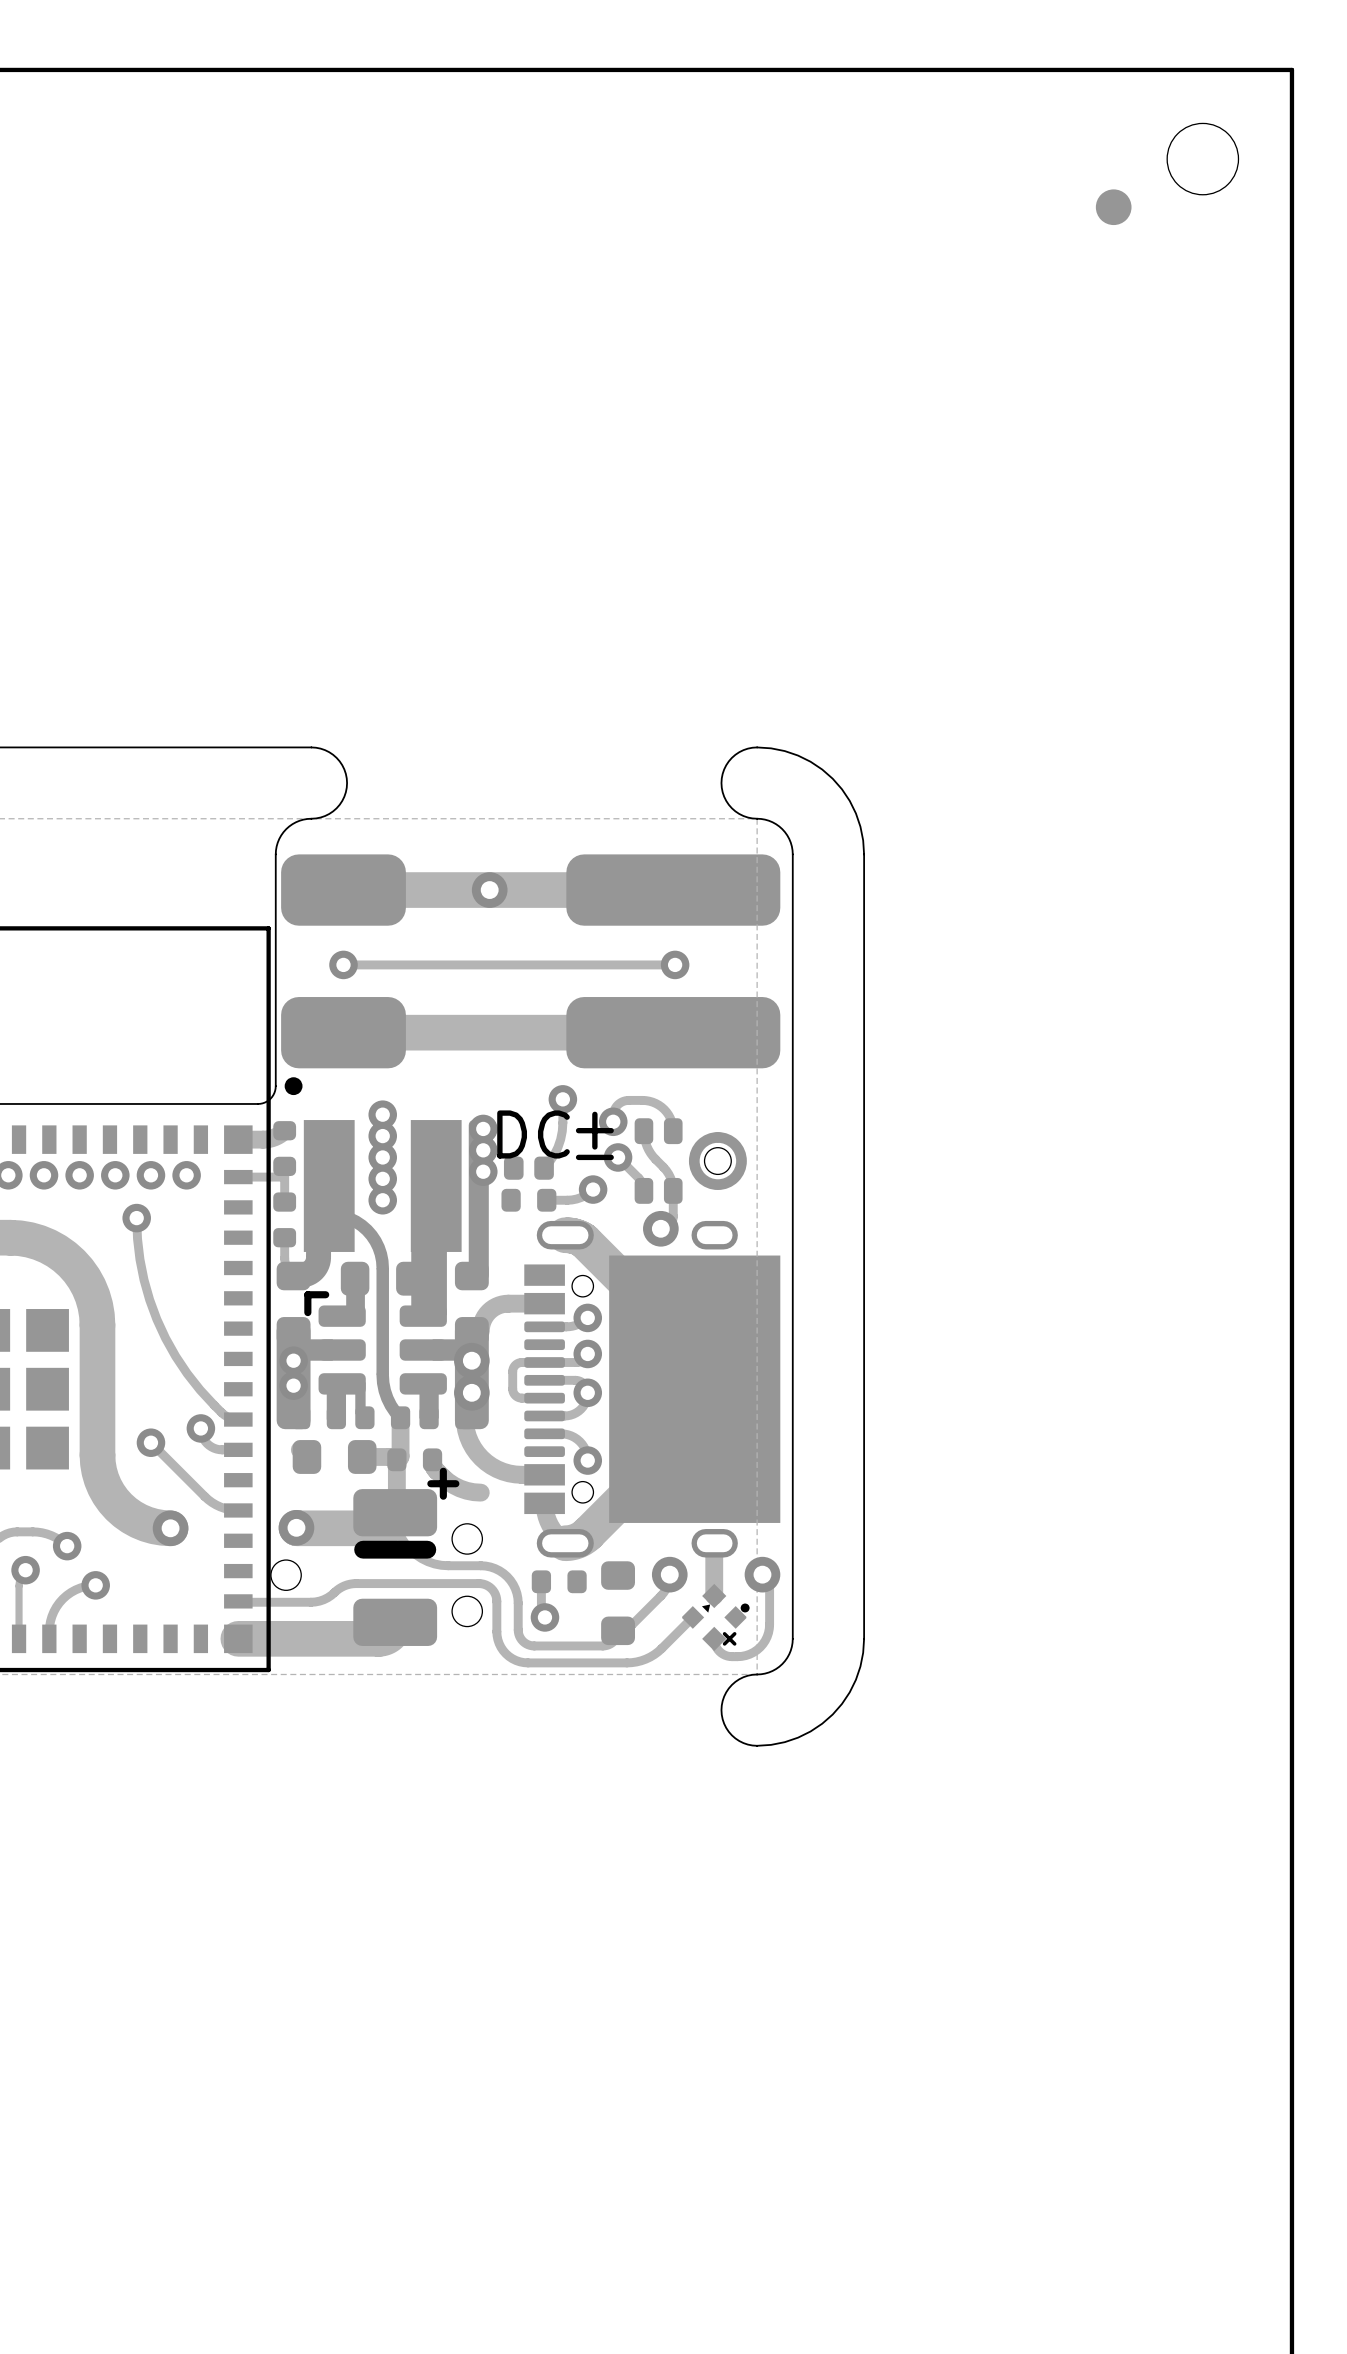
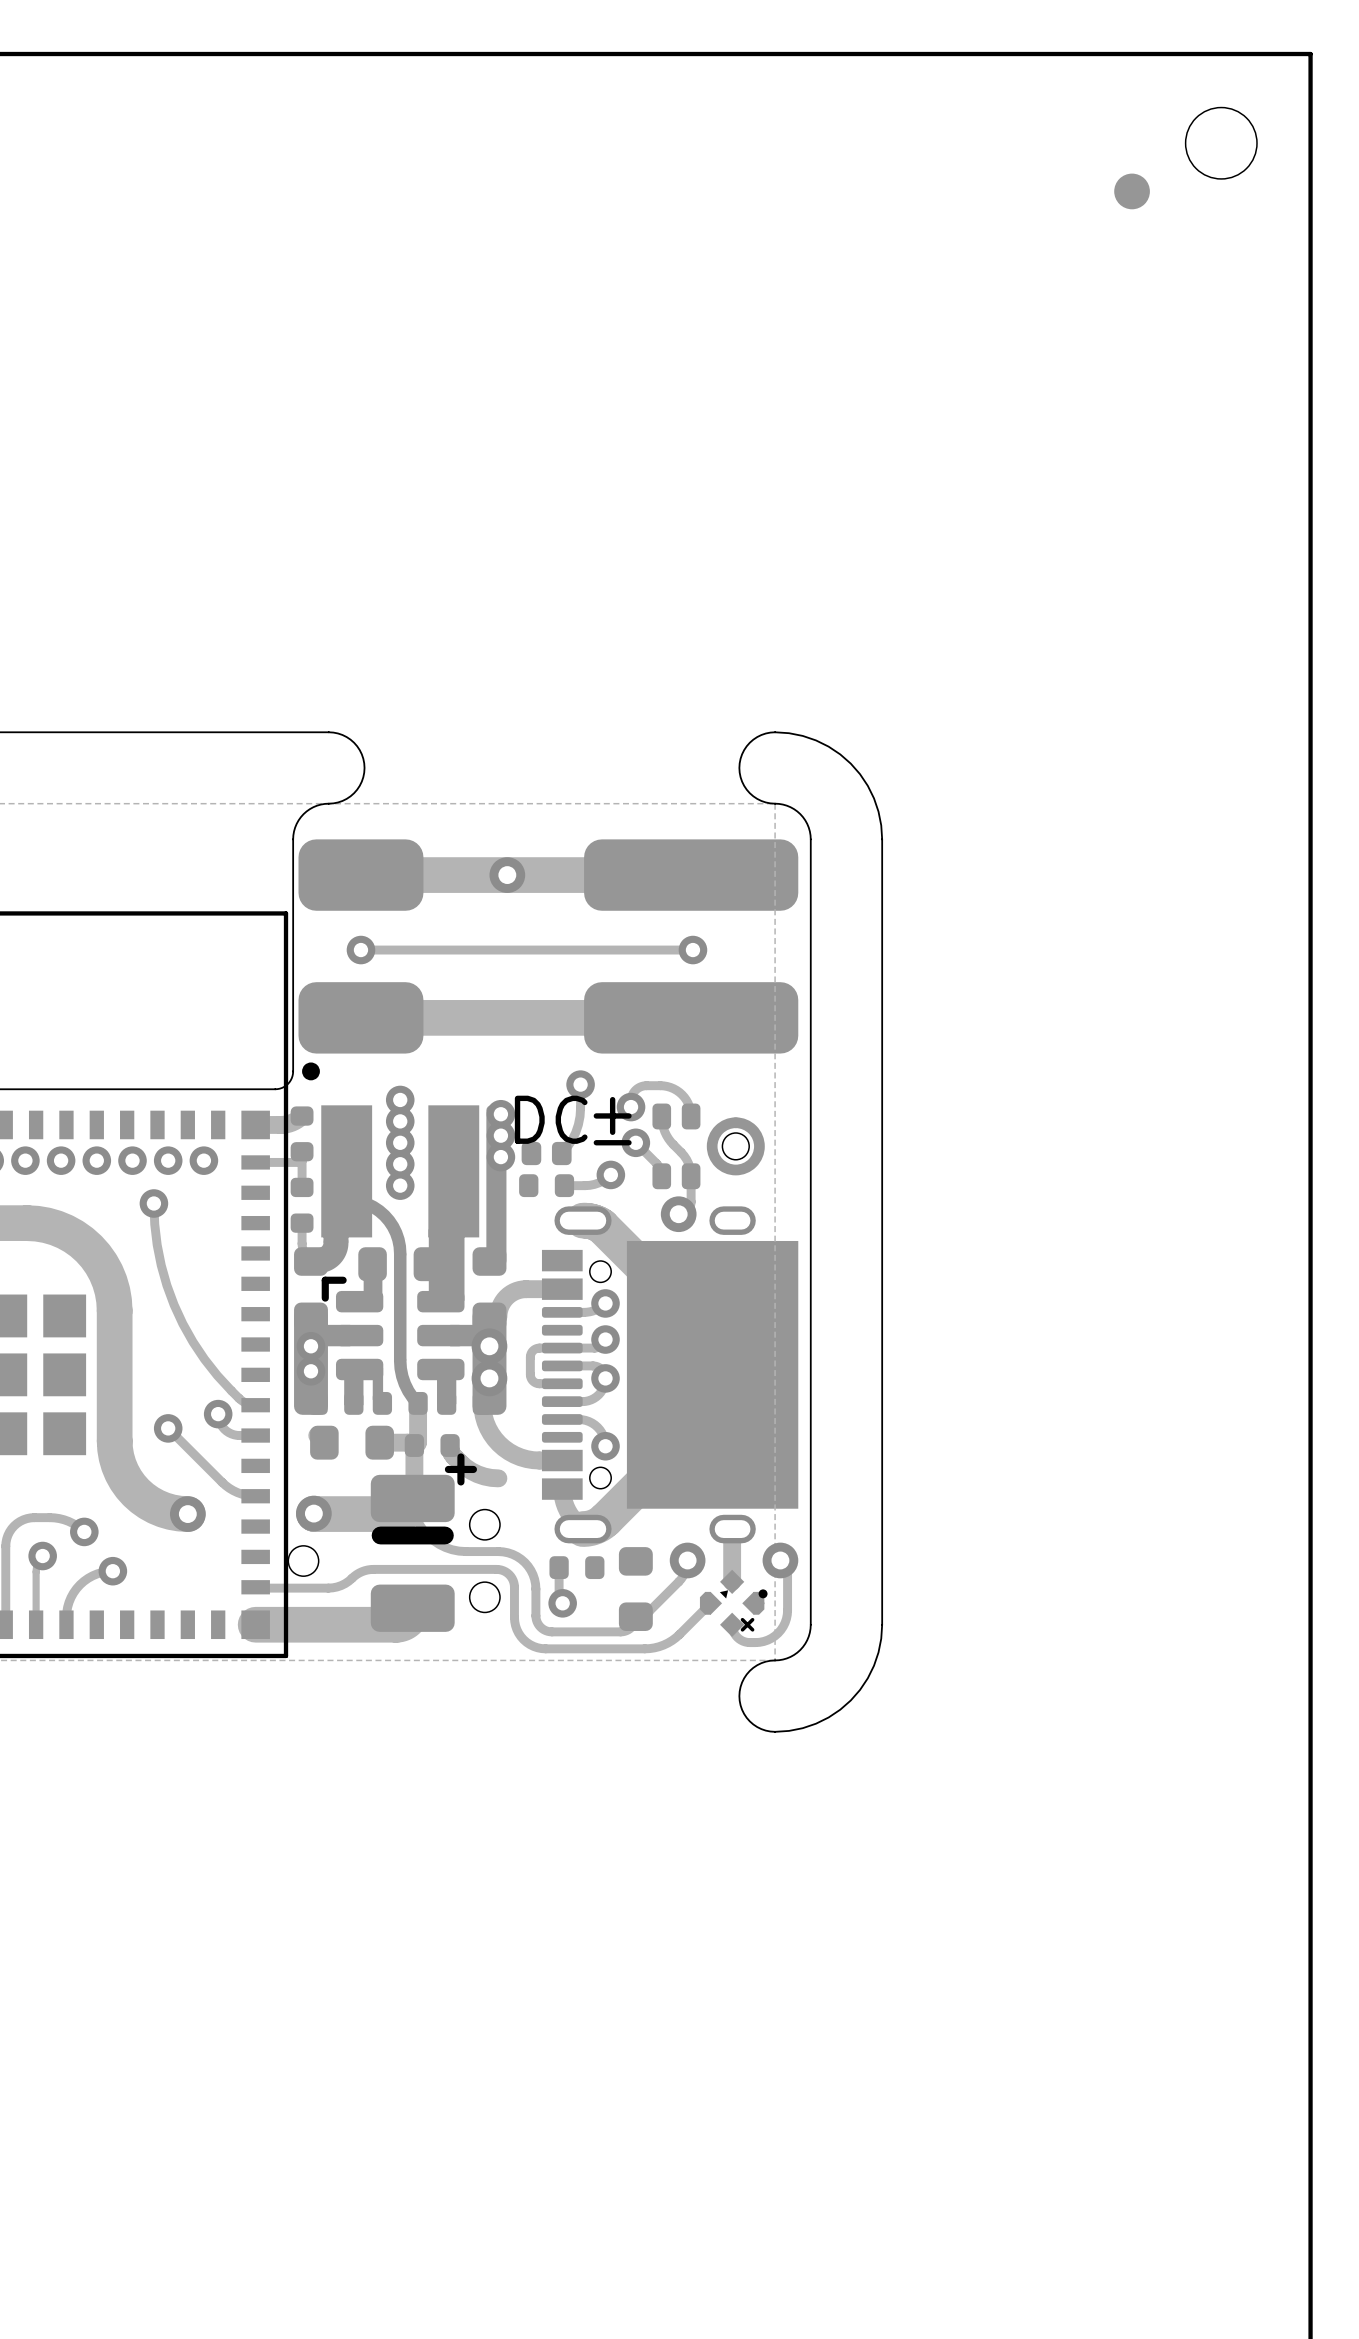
part footprint: [682, 1583, 750, 1651] -> [699, 1569, 768, 1637]

